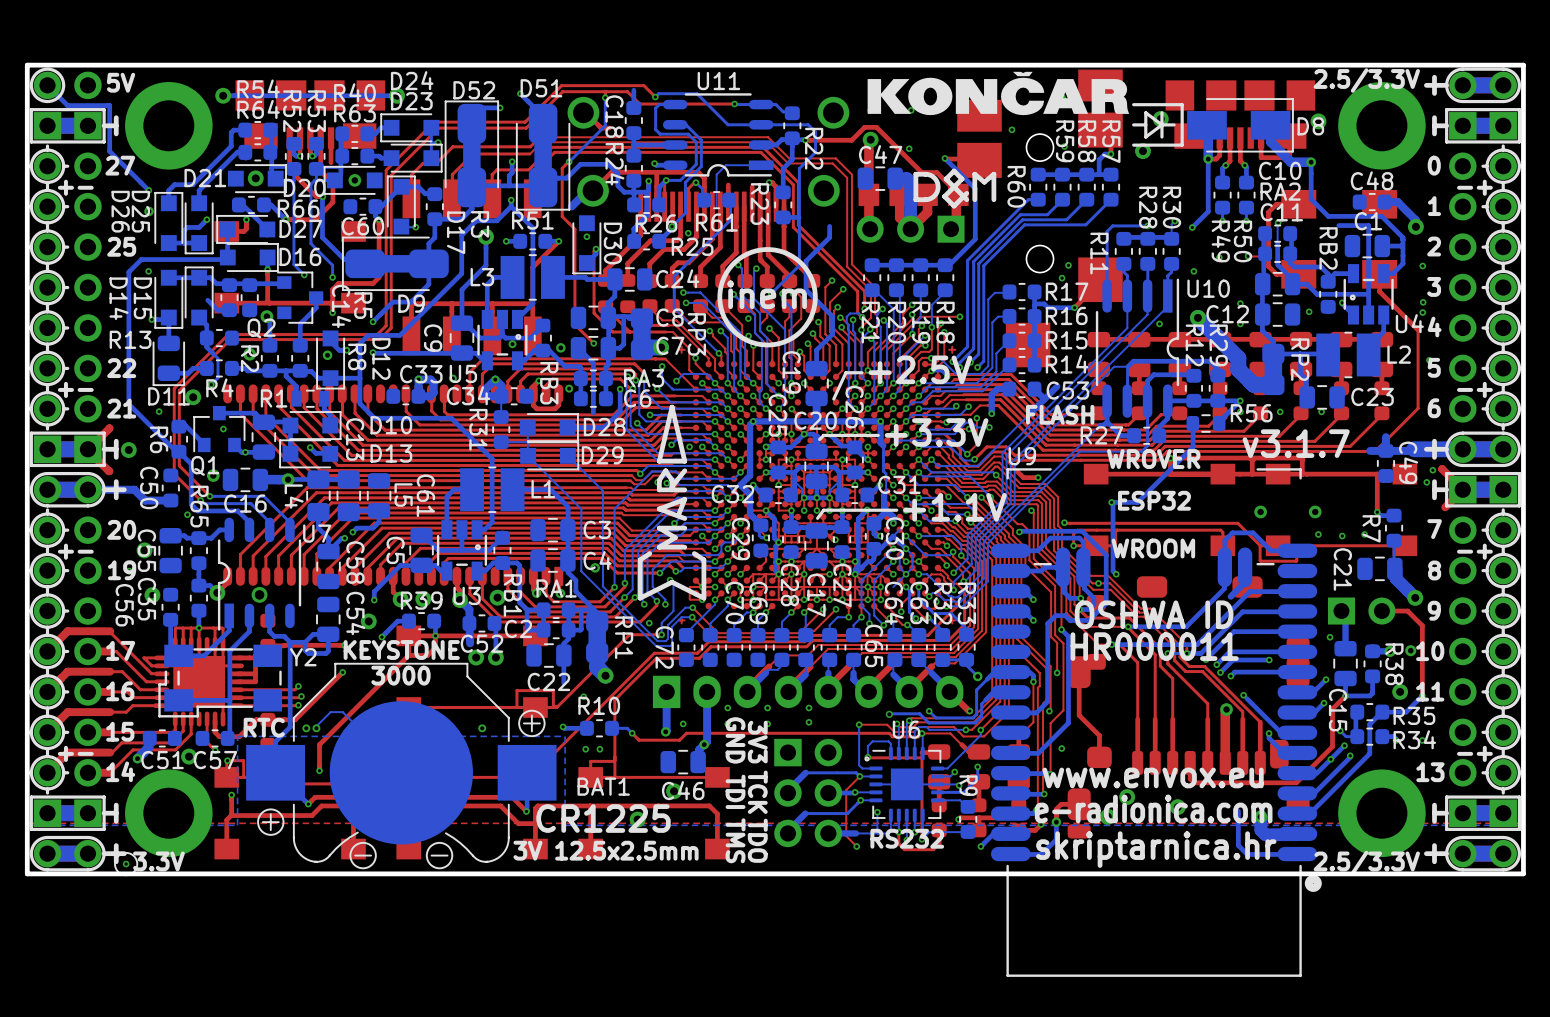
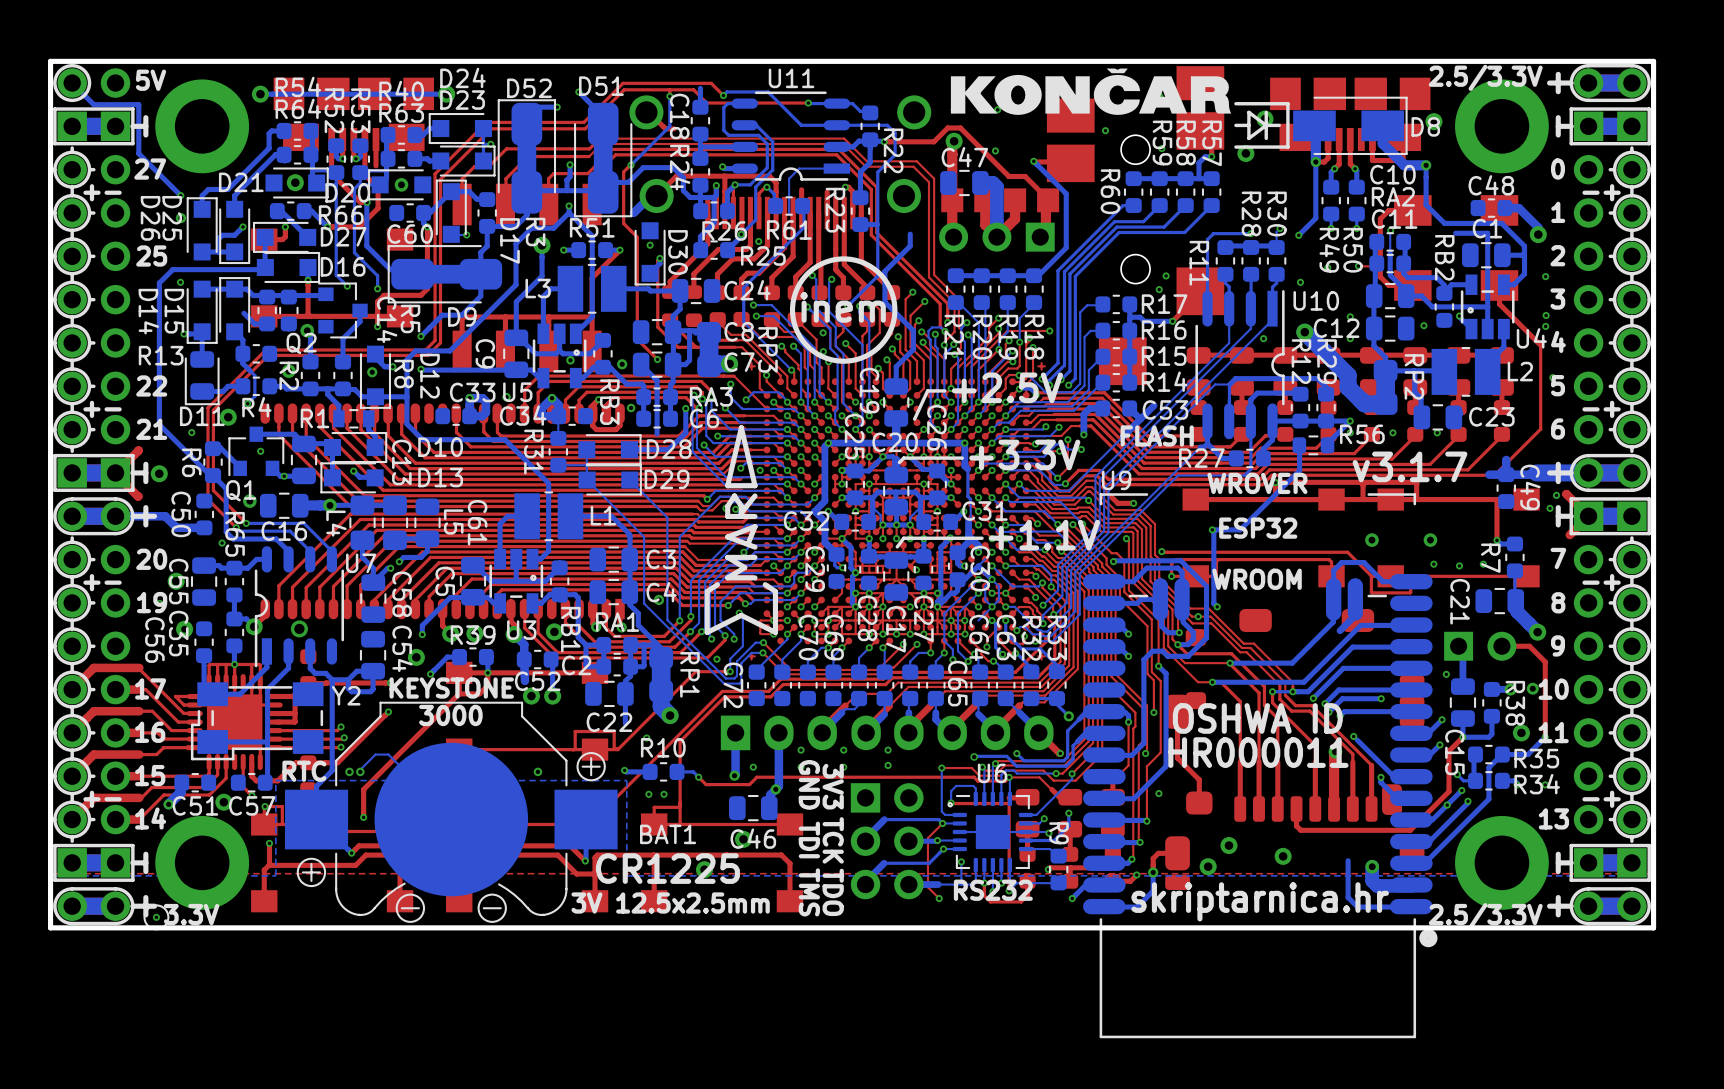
drawing: [913, 168, 997, 209] -> none
text position: OSHWA ID (1154, 614) -> OSHWA ID (1257, 718)
text position: HR000011 (1154, 646) -> HR000011 (1258, 752)
text: www.envox.eu (1153, 777) -> none
text: e-radionica.com (1153, 808) -> none

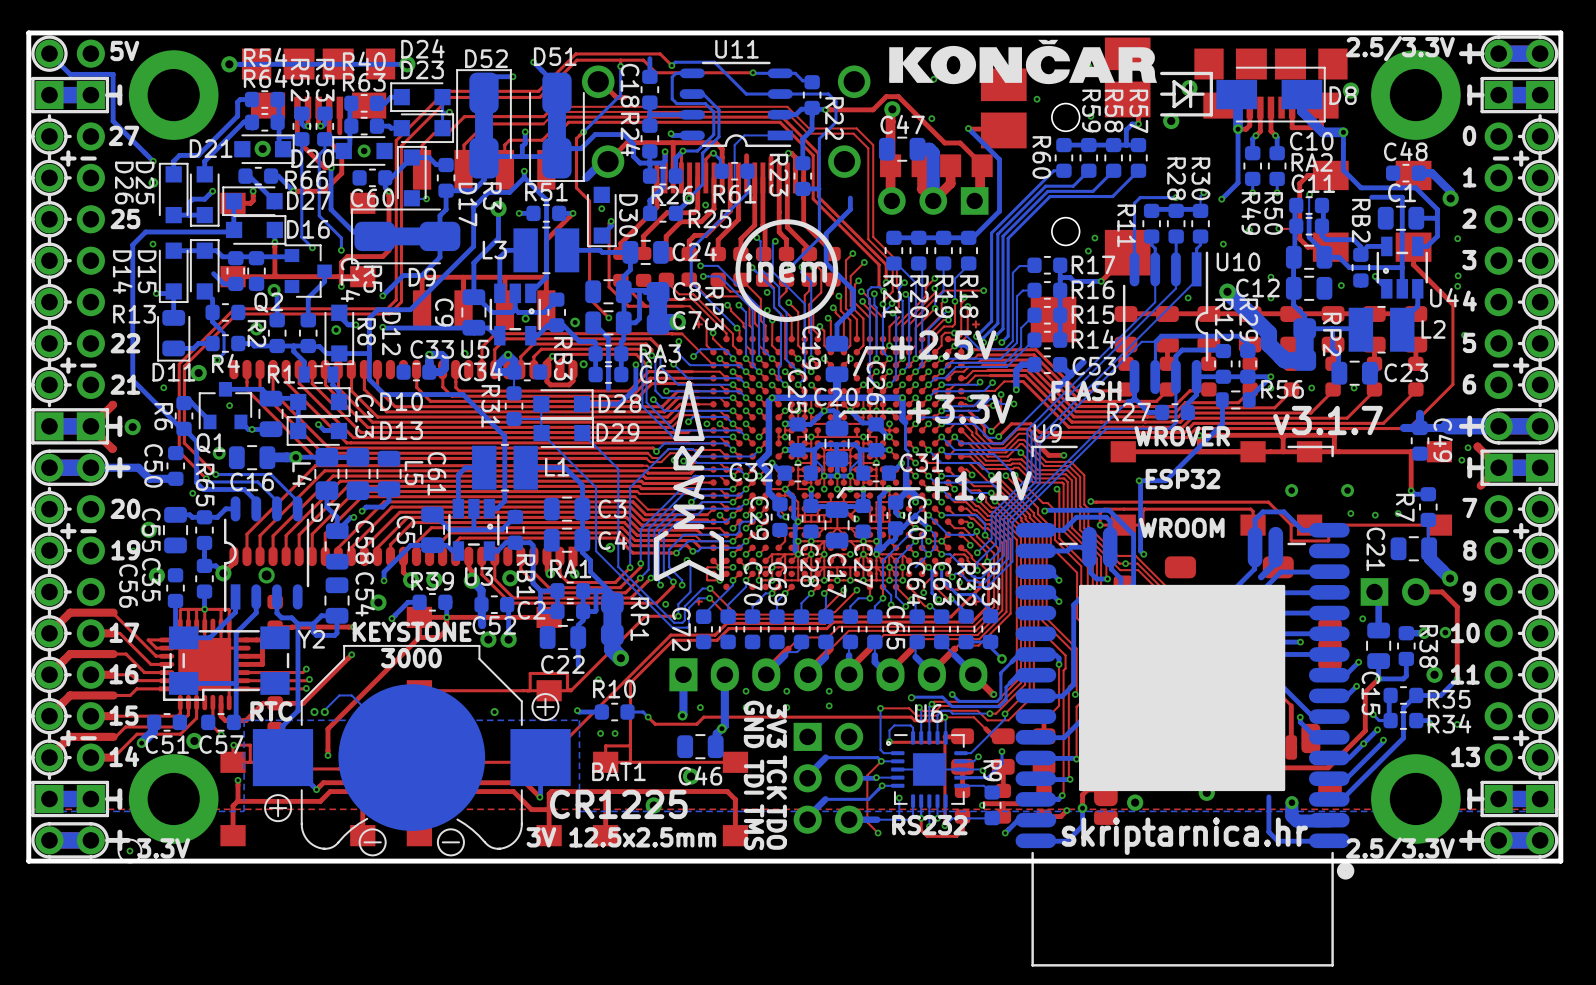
drawing: none -> [1079, 584, 1286, 792]
text: OSHWA ID (1257, 718) -> none
text: HR000011 (1258, 752) -> none

